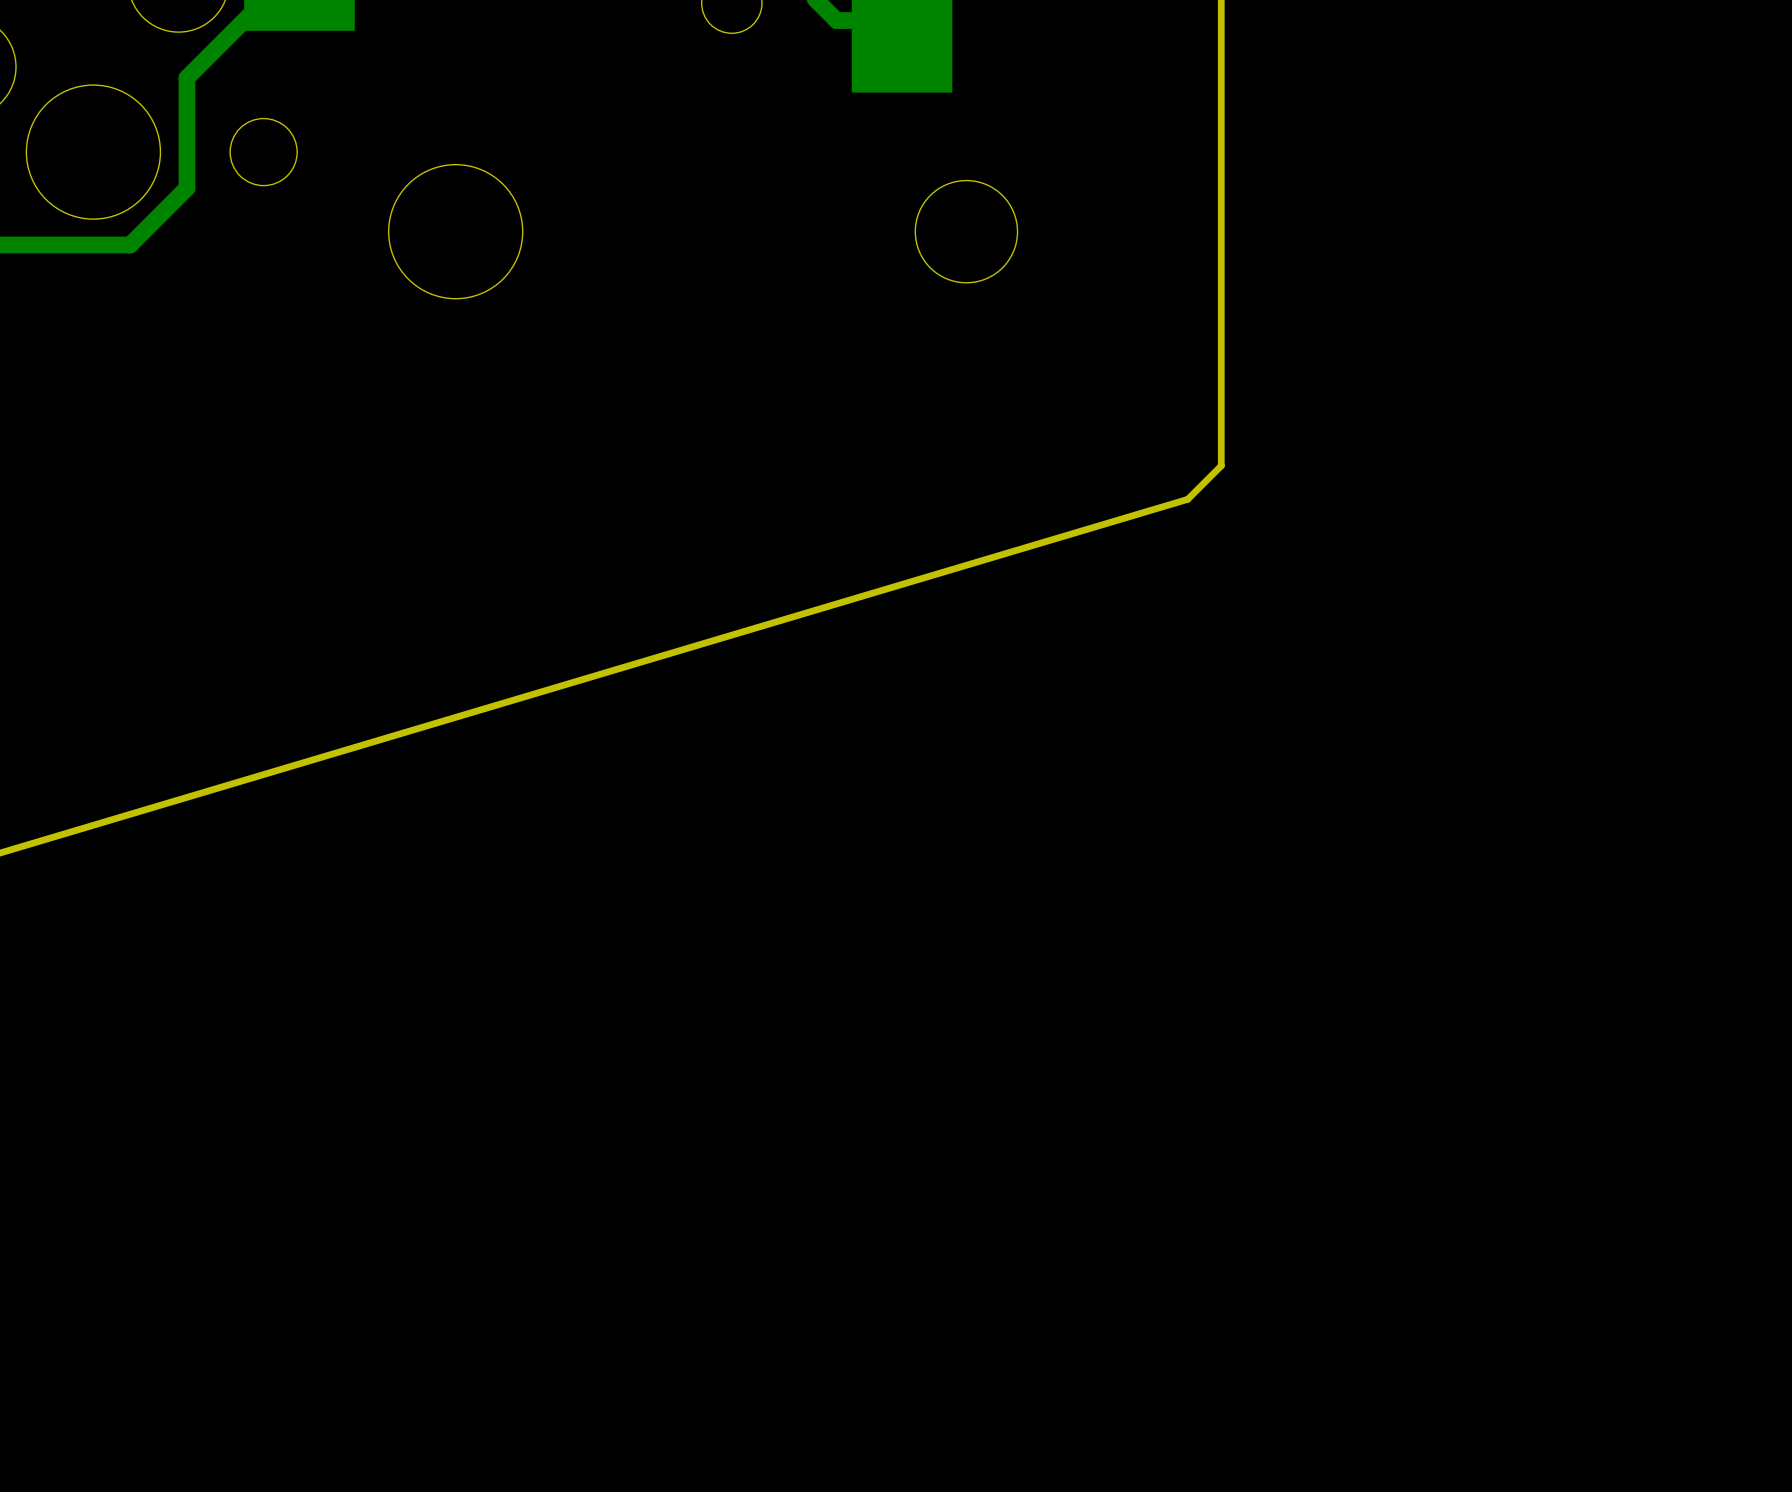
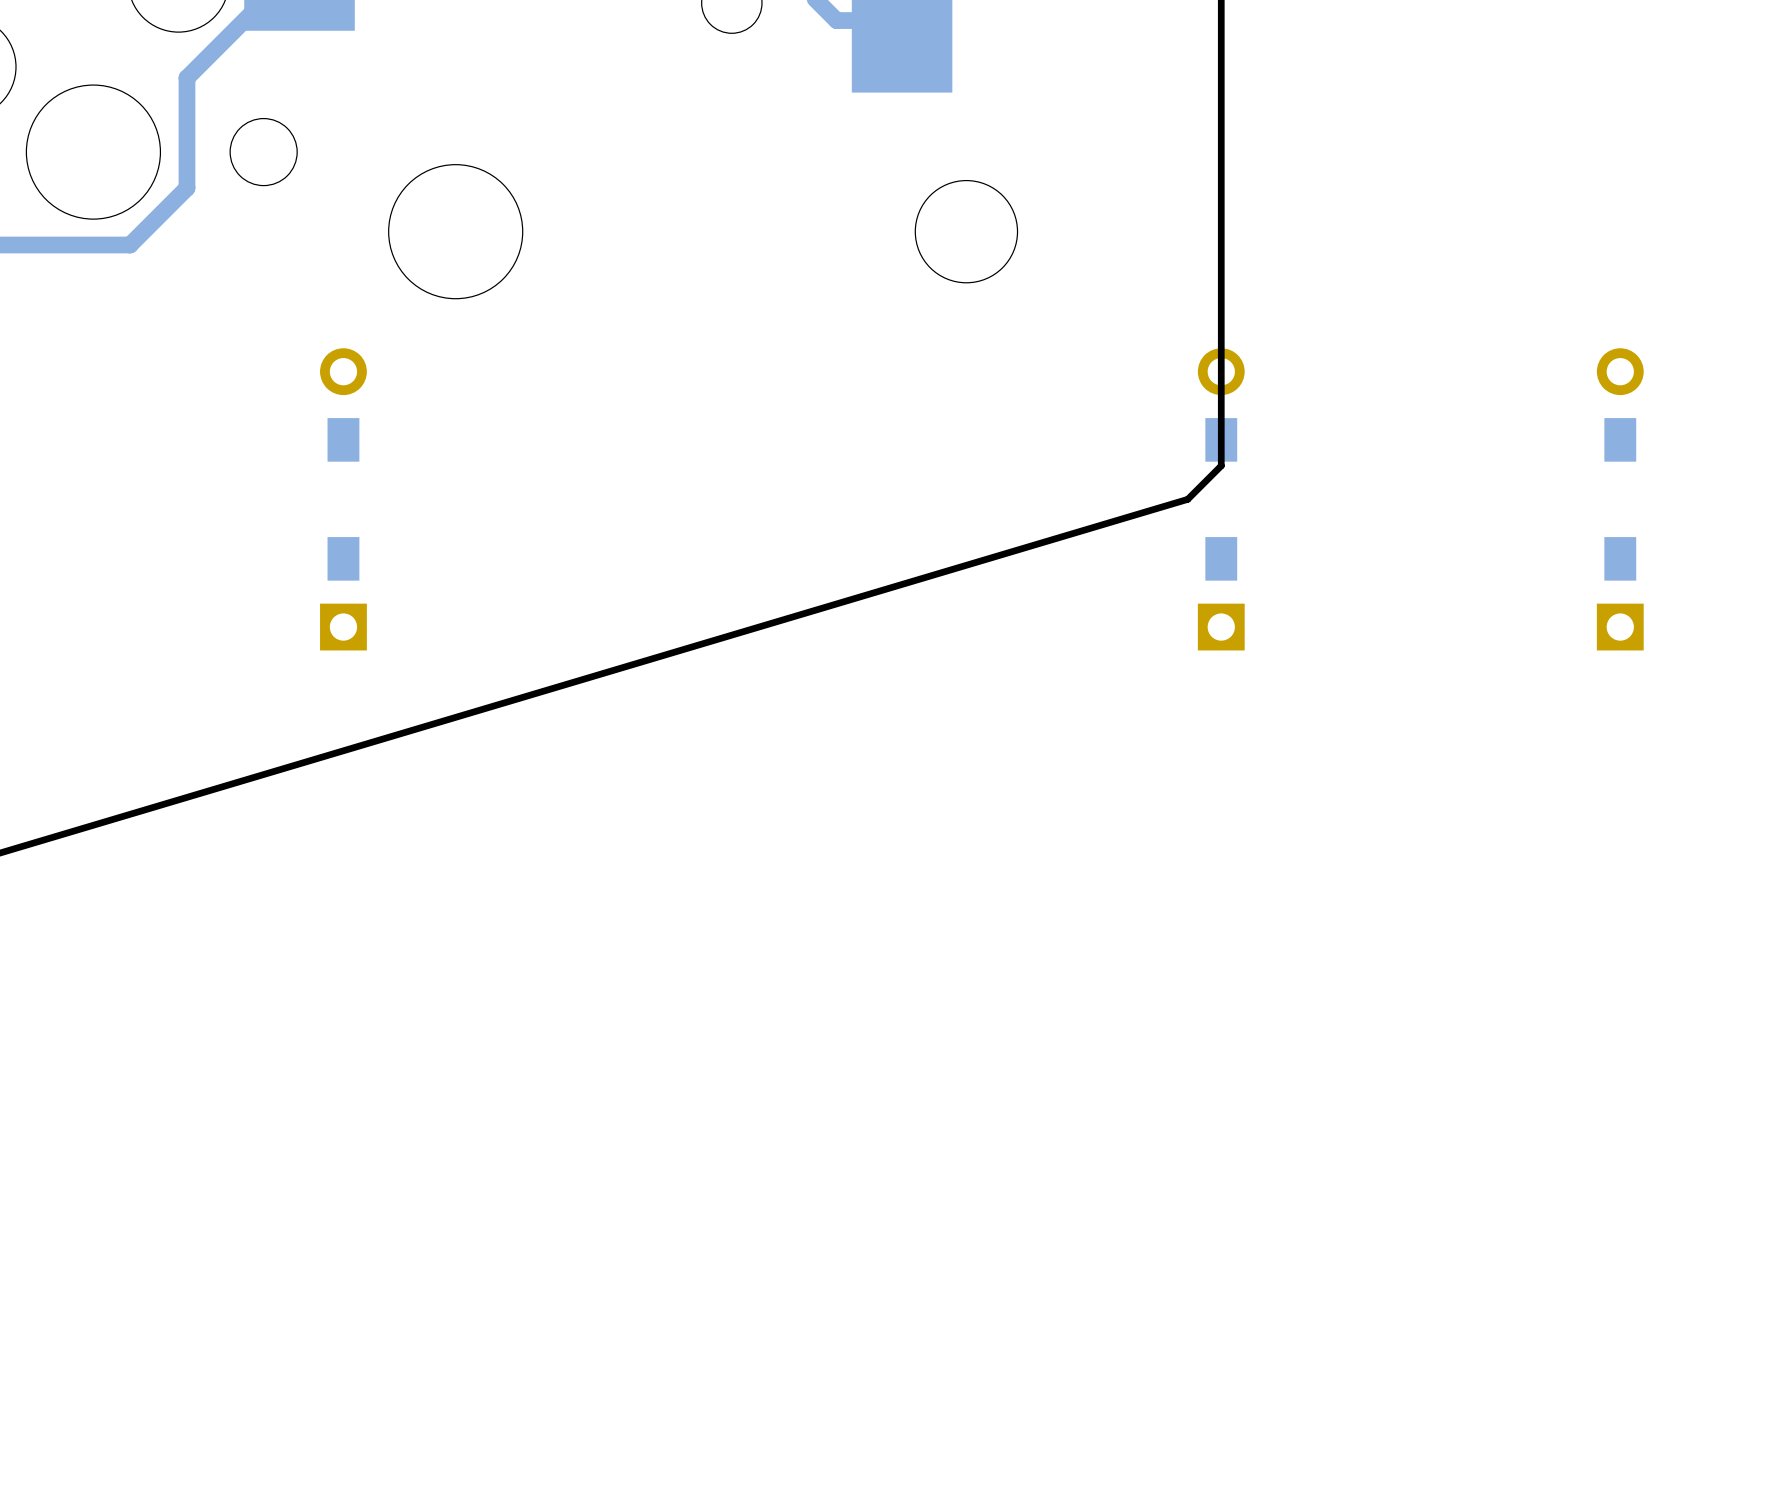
part: none -> (343, 499)
part: none -> (1221, 499)
part: none -> (1620, 499)

